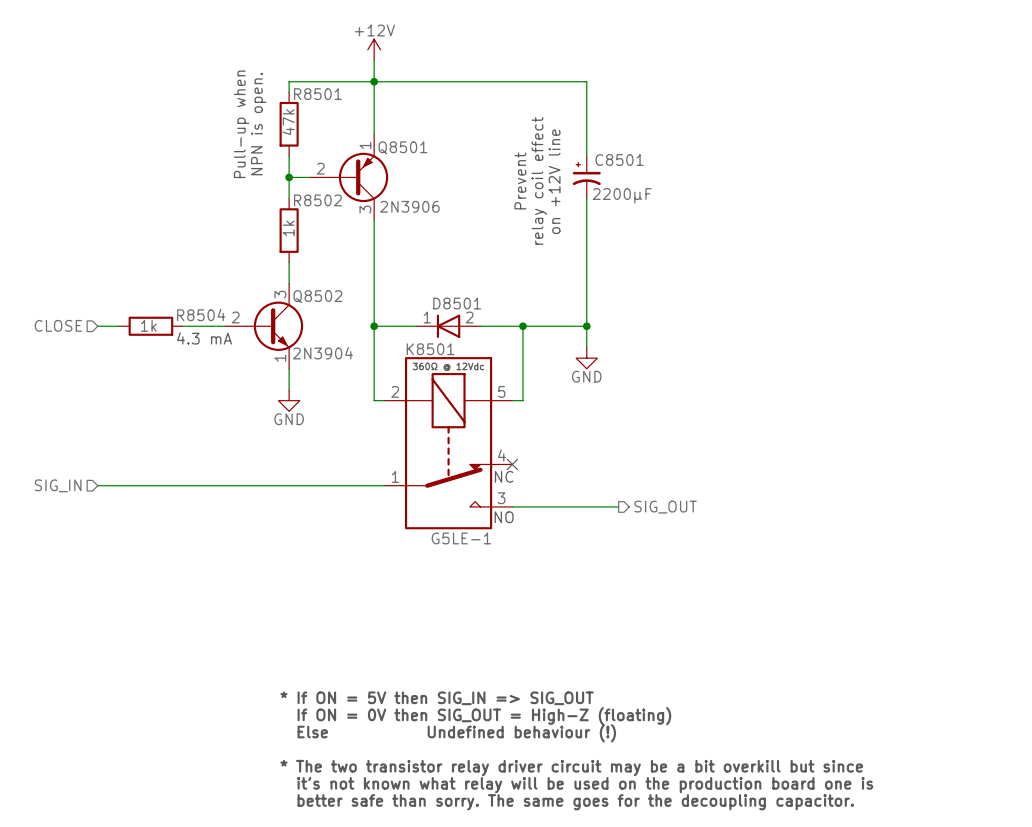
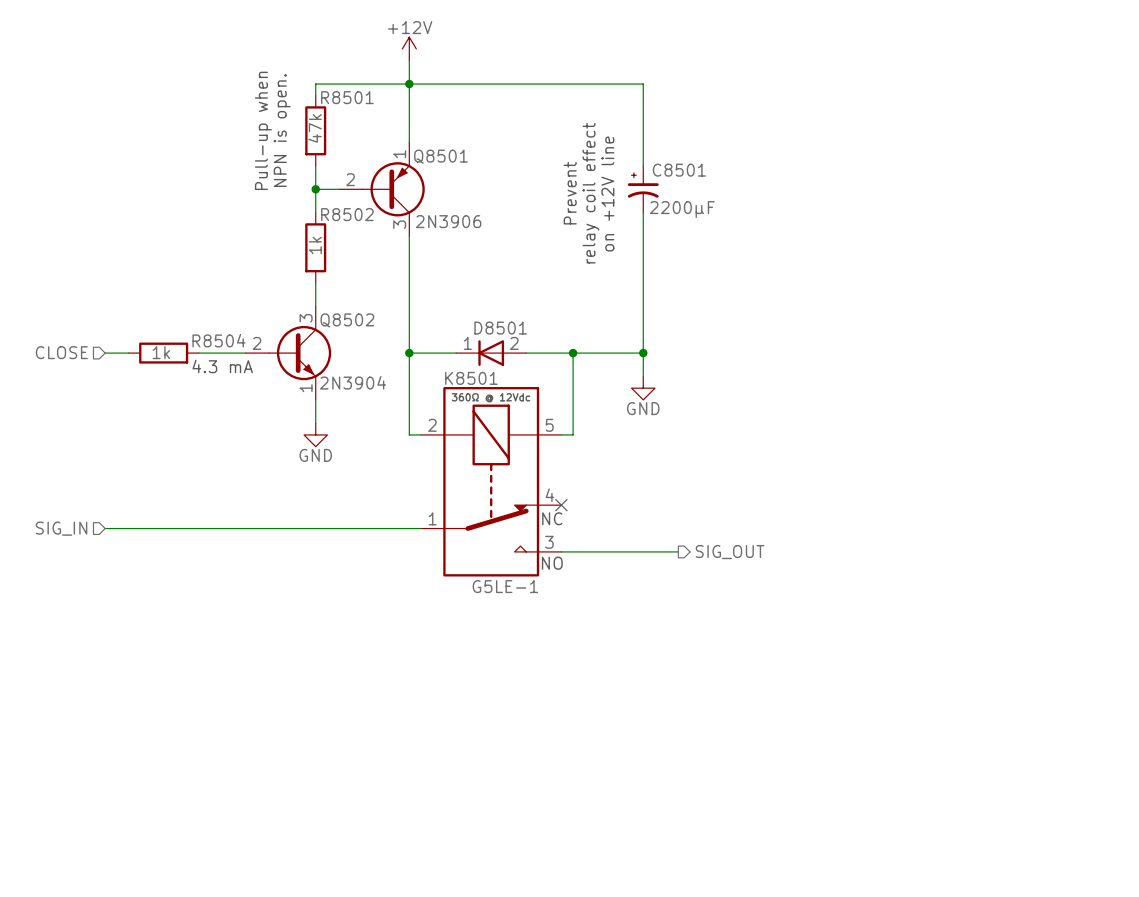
text: * If ON = 5V then SIG_IN => SIG_OUT (437, 698) -> none
text: If ON = 0V then SIG_OUT = High-Z (floating) (484, 716) -> none
text: Else Undefined behaviour (!) (456, 733) -> none
text: * The two transistor relay driver circuit may be a bit overkill but since (571, 768) -> none
text: it's not known what relay will be used on the production board one is (585, 785) -> none
text: better safe than sorry. The same goes for the decoupling capacitor. (575, 802) -> none

